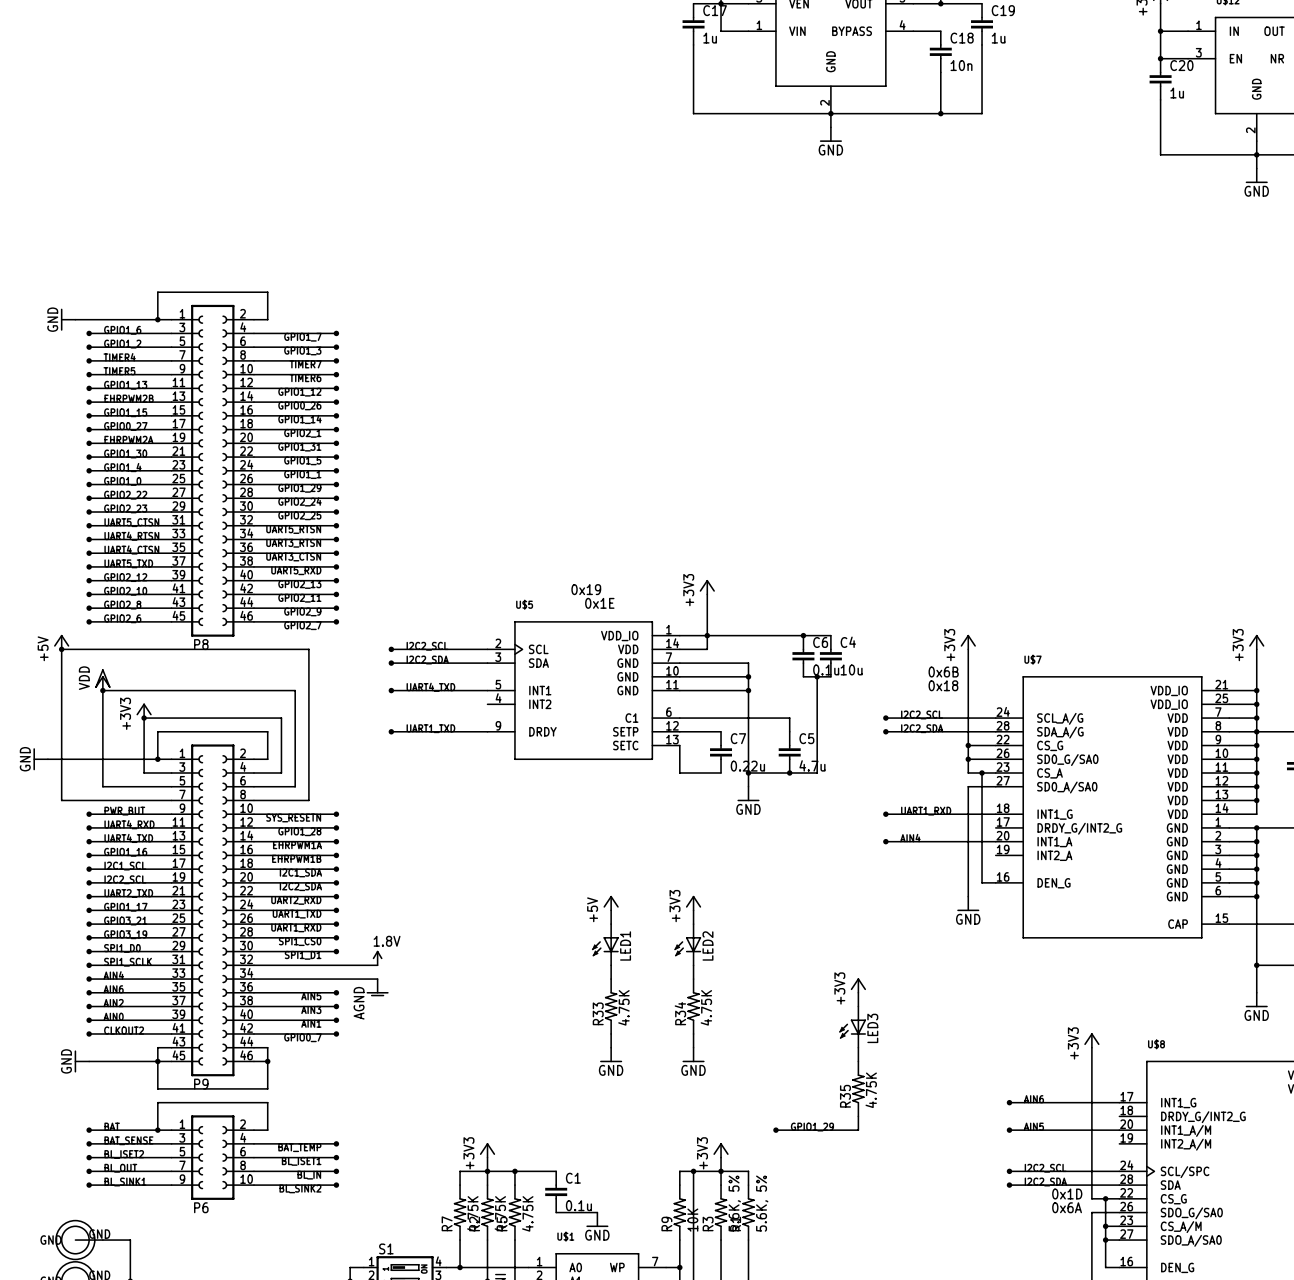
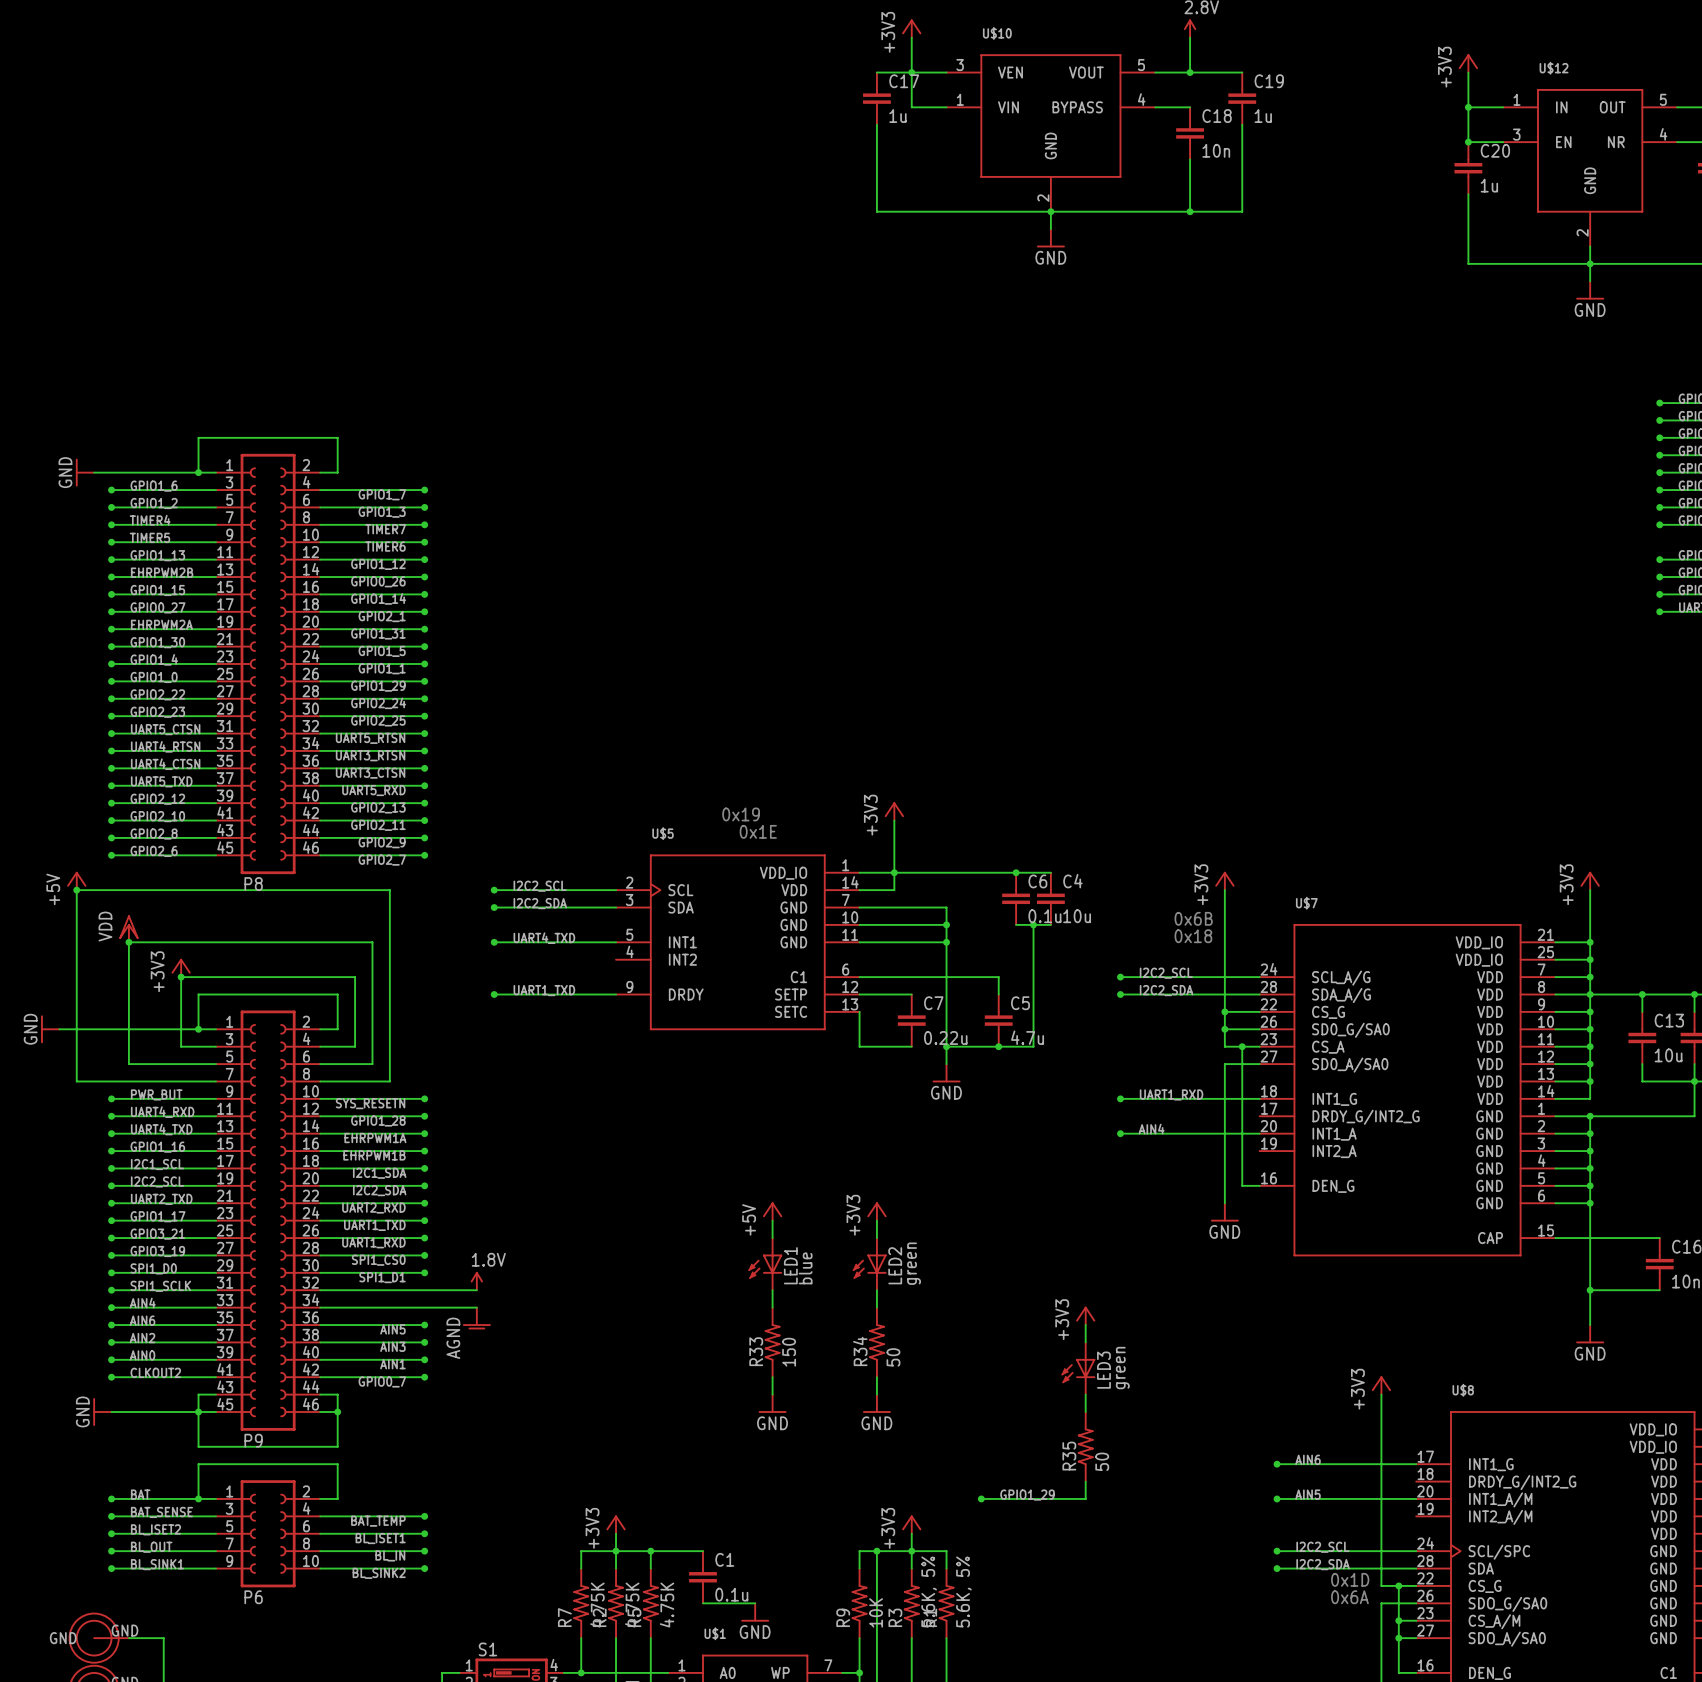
LED2 value: none -> green (914, 1263)
LED1 value: none -> blue (805, 1268)
R33 value: 4.75K (623, 1007) -> 150 (789, 1352)
R34 value: 4.75K (706, 1007) -> 50 (893, 1357)
LED3 value: none -> green (1122, 1368)
R35 value: 4.75K (871, 1090) -> 50 (1102, 1461)

